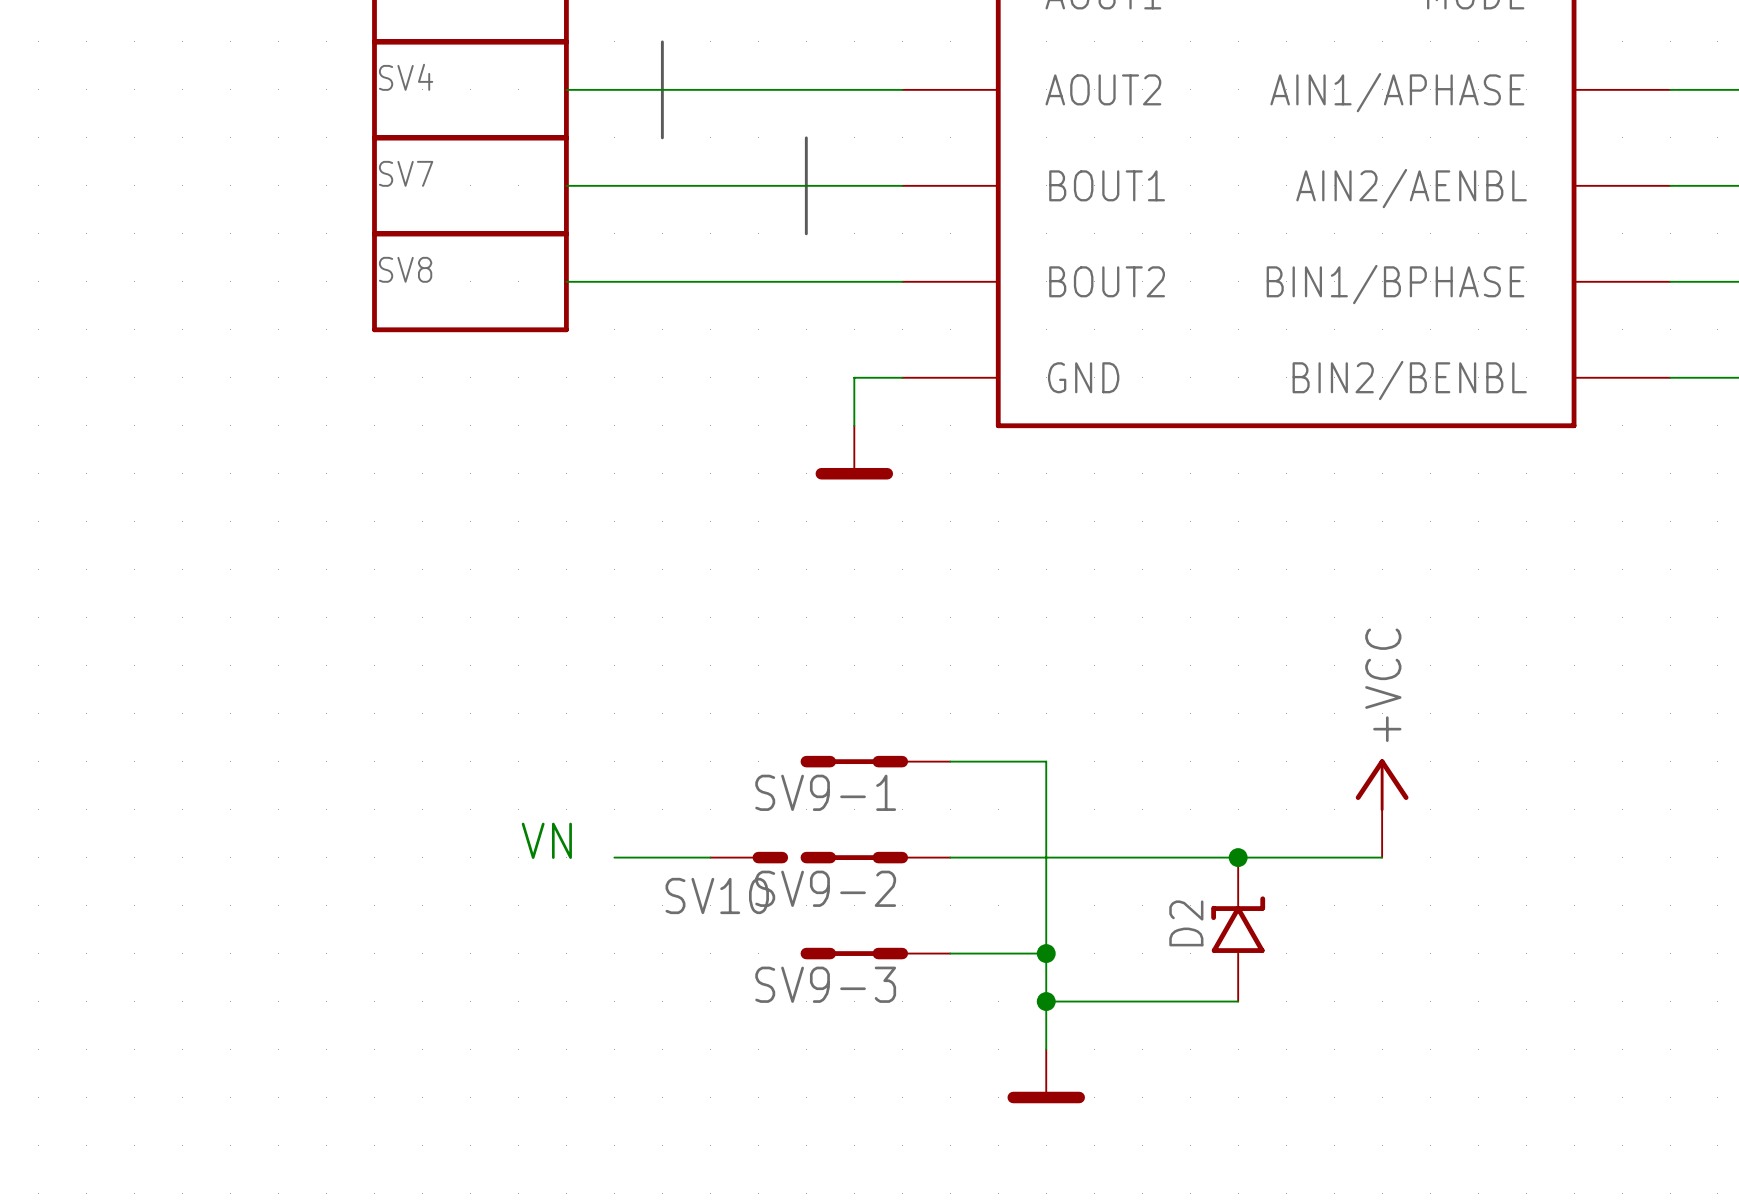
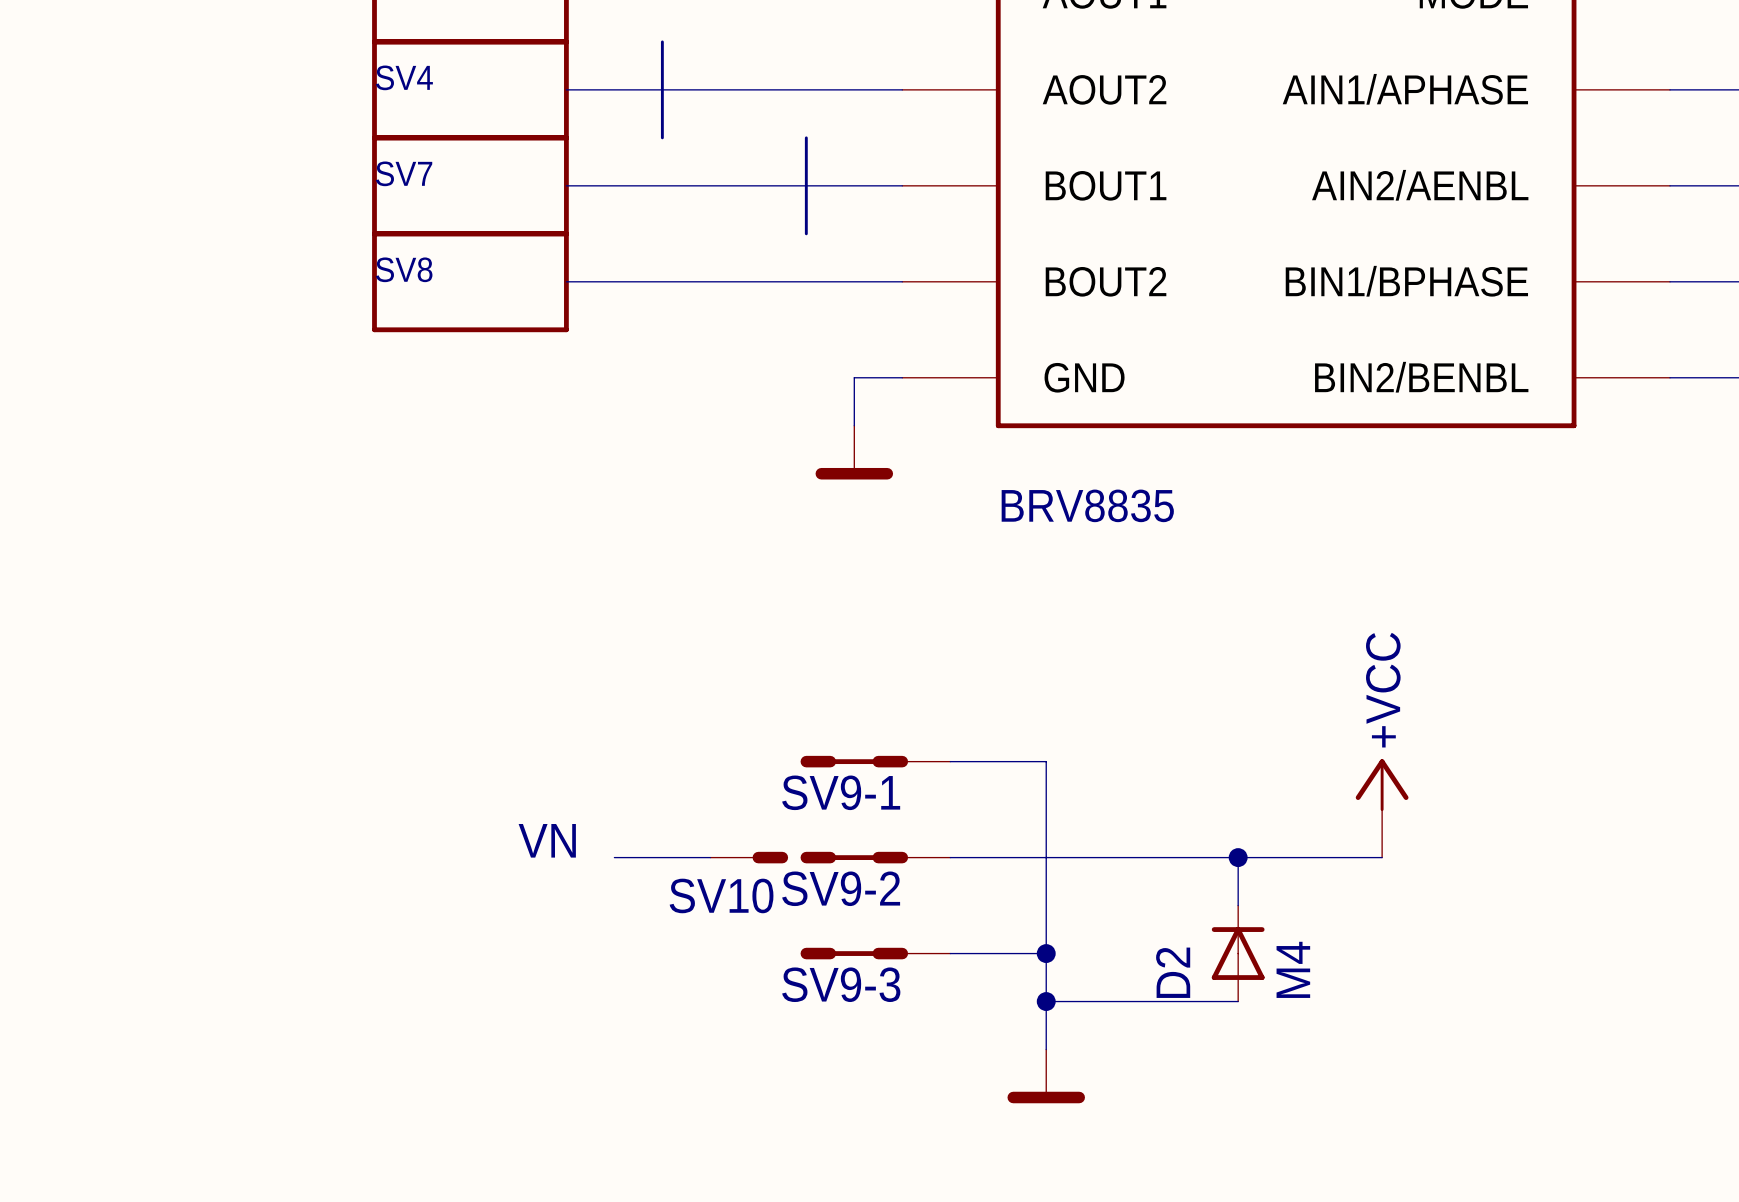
part value: none -> BRV8835 (1087, 505)
D2 symbol: [1211, 857, 1266, 1002] -> [1211, 905, 1265, 1002]
D2 value: none -> M4 (1293, 969)

